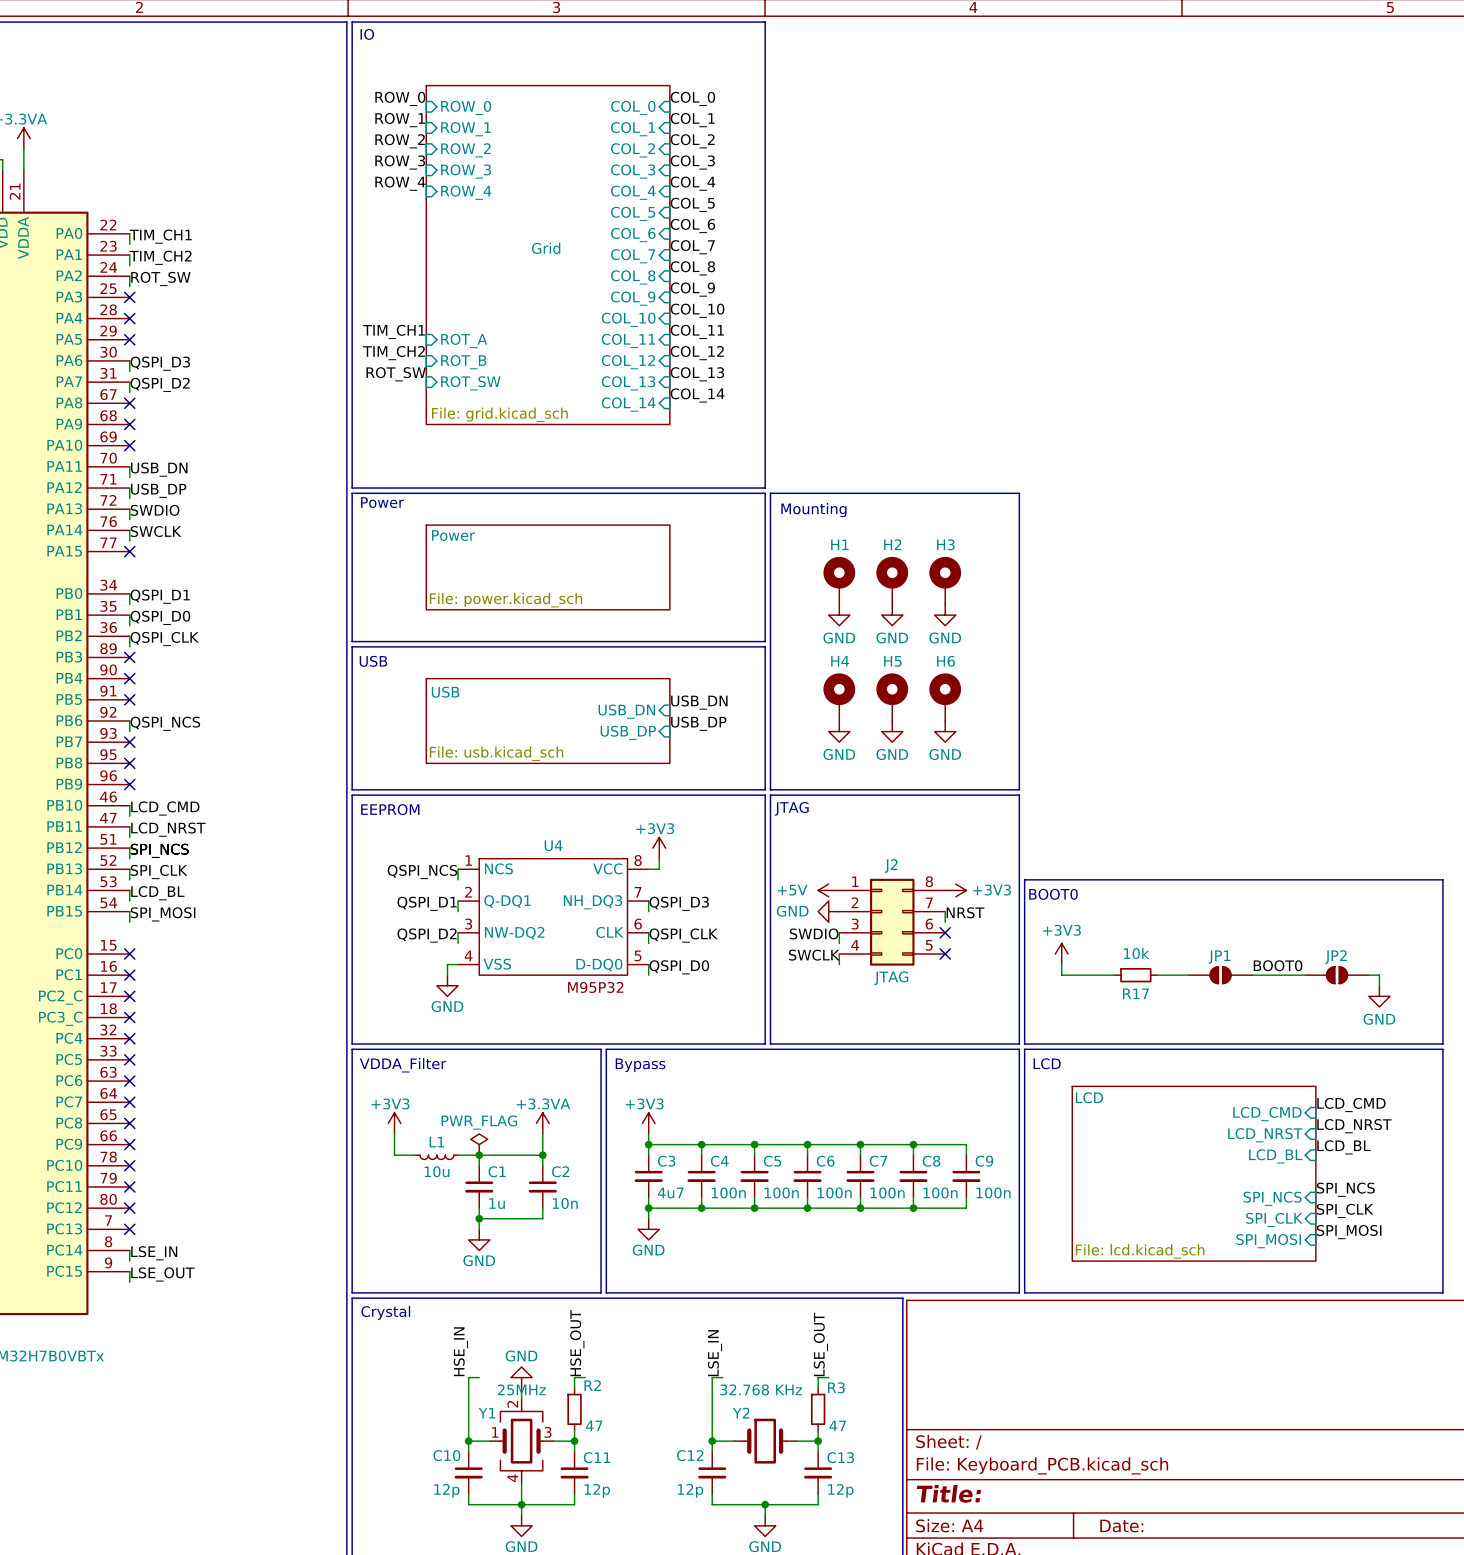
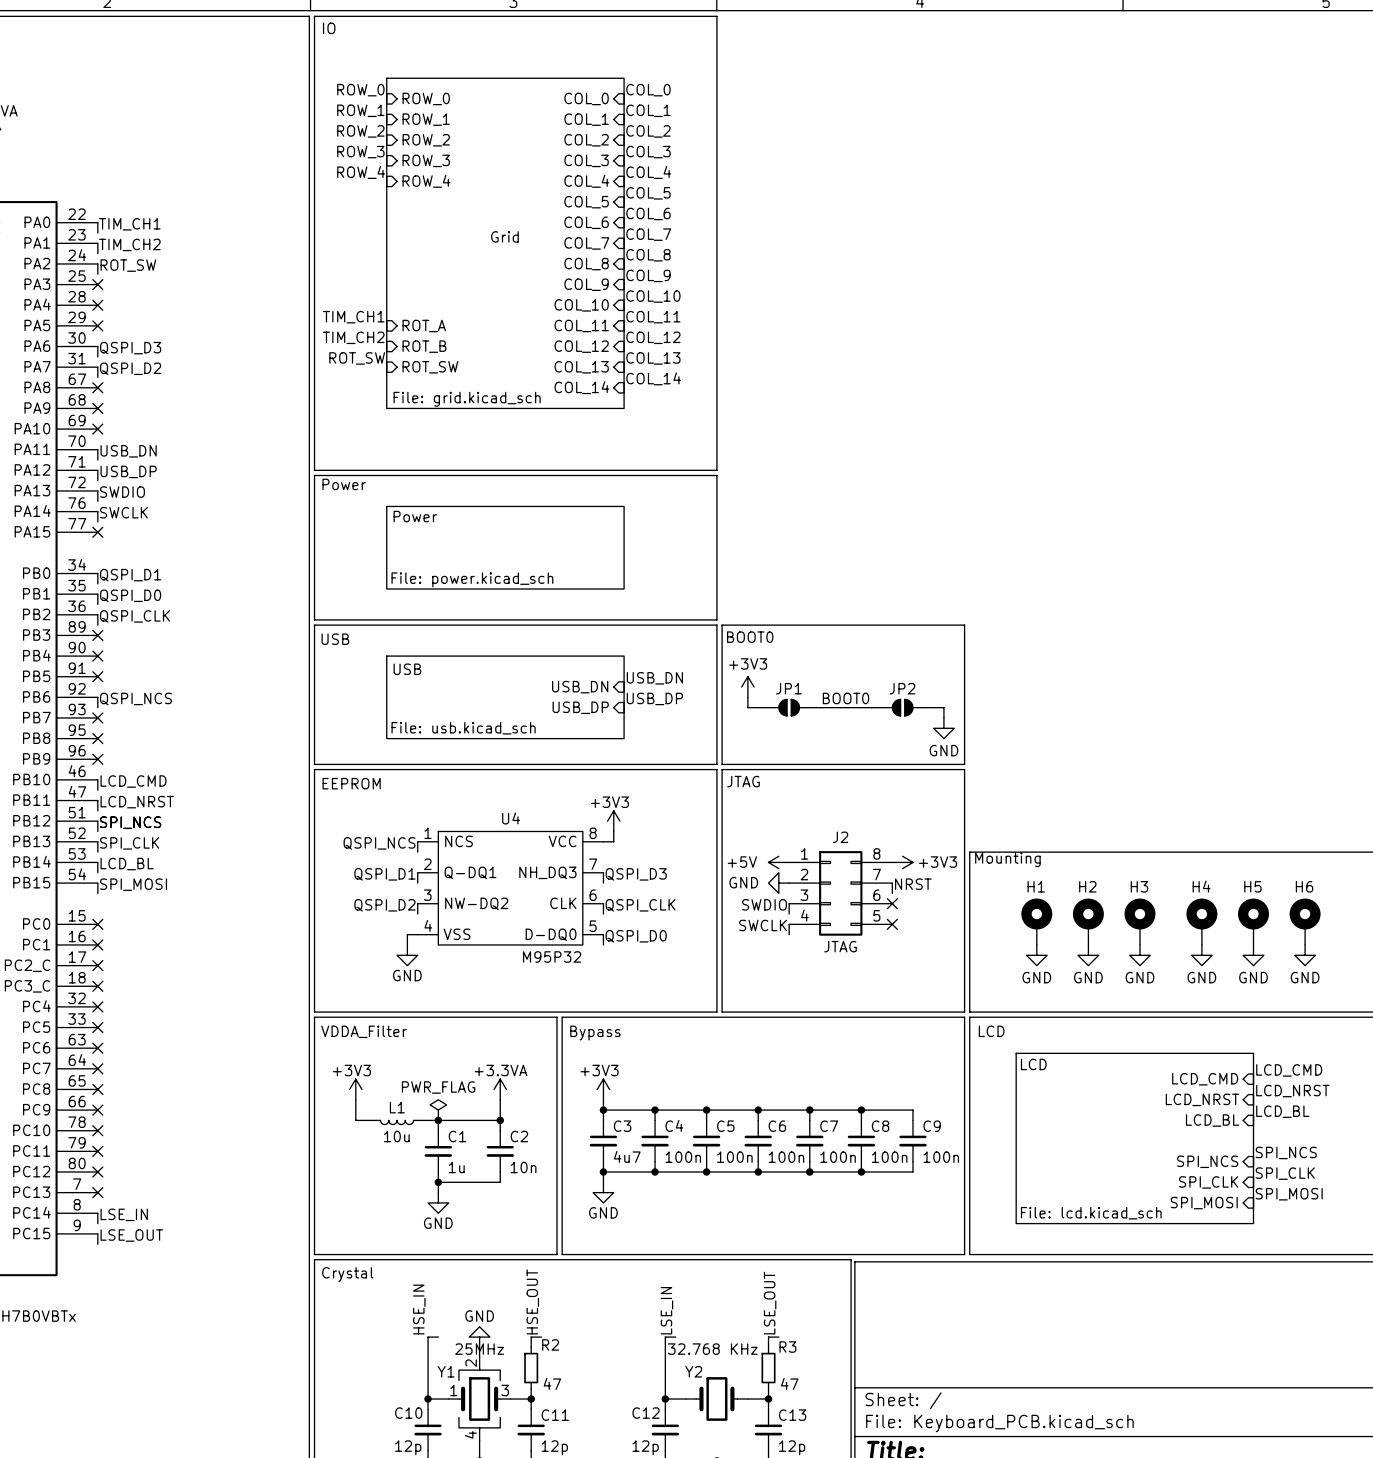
text: Mounting (813, 510) -> none
H1 position: (839, 580) -> (1036, 921)
H2 position: (892, 580) -> (1088, 921)
H3 position: (945, 580) -> (1139, 921)
power symbol: GND (839, 615) -> none
power symbol: GND (892, 615) -> none
power symbol: GND (945, 615) -> none
line: (770, 646) (770, 493) (1019, 493) (1019, 646) -> (722, 625) (964, 625)
text: none -> BOOT0 (750, 637)
H4 position: (839, 697) -> (1201, 921)
H5 position: (892, 697) -> (1253, 921)
H6 position: (945, 697) -> (1305, 921)
power symbol: none -> +3V3 (747, 687)
wire: none -> (747, 697) (747, 707) (758, 707)
label: none -> BOOT0 (845, 698)
power symbol: GND (839, 731) -> none
wire: none -> (820, 707) (871, 707)
power symbol: GND (892, 731) -> none
power symbol: GND (945, 731) -> none
wire: none -> (933, 707) (943, 707) (943, 717)
power symbol: none -> GND (943, 728)
text: none -> Mounting (1007, 859)
text: BOOT0 (1053, 894) -> none
power symbol: +3V3 (1061, 953) -> none
wire: (1061, 964) (1061, 975) (1114, 975) -> none
label: BOOT0 (1278, 965) -> none
R17: 10k (1135, 975) -> none
wire: (1157, 975) (1188, 975) -> none
JP1 position: (1220, 975) -> (789, 707)
wire: (1252, 975) (1305, 975) -> none
JP2 position: (1337, 975) -> (902, 707)
wire: (1368, 975) (1379, 975) (1379, 985) -> none
power symbol: none -> GND (1036, 955)
power symbol: none -> GND (1088, 955)
power symbol: none -> GND (1139, 955)
power symbol: none -> GND (1201, 955)
power symbol: none -> GND (1253, 955)
power symbol position: GND (1379, 996) -> GND (1305, 955)

